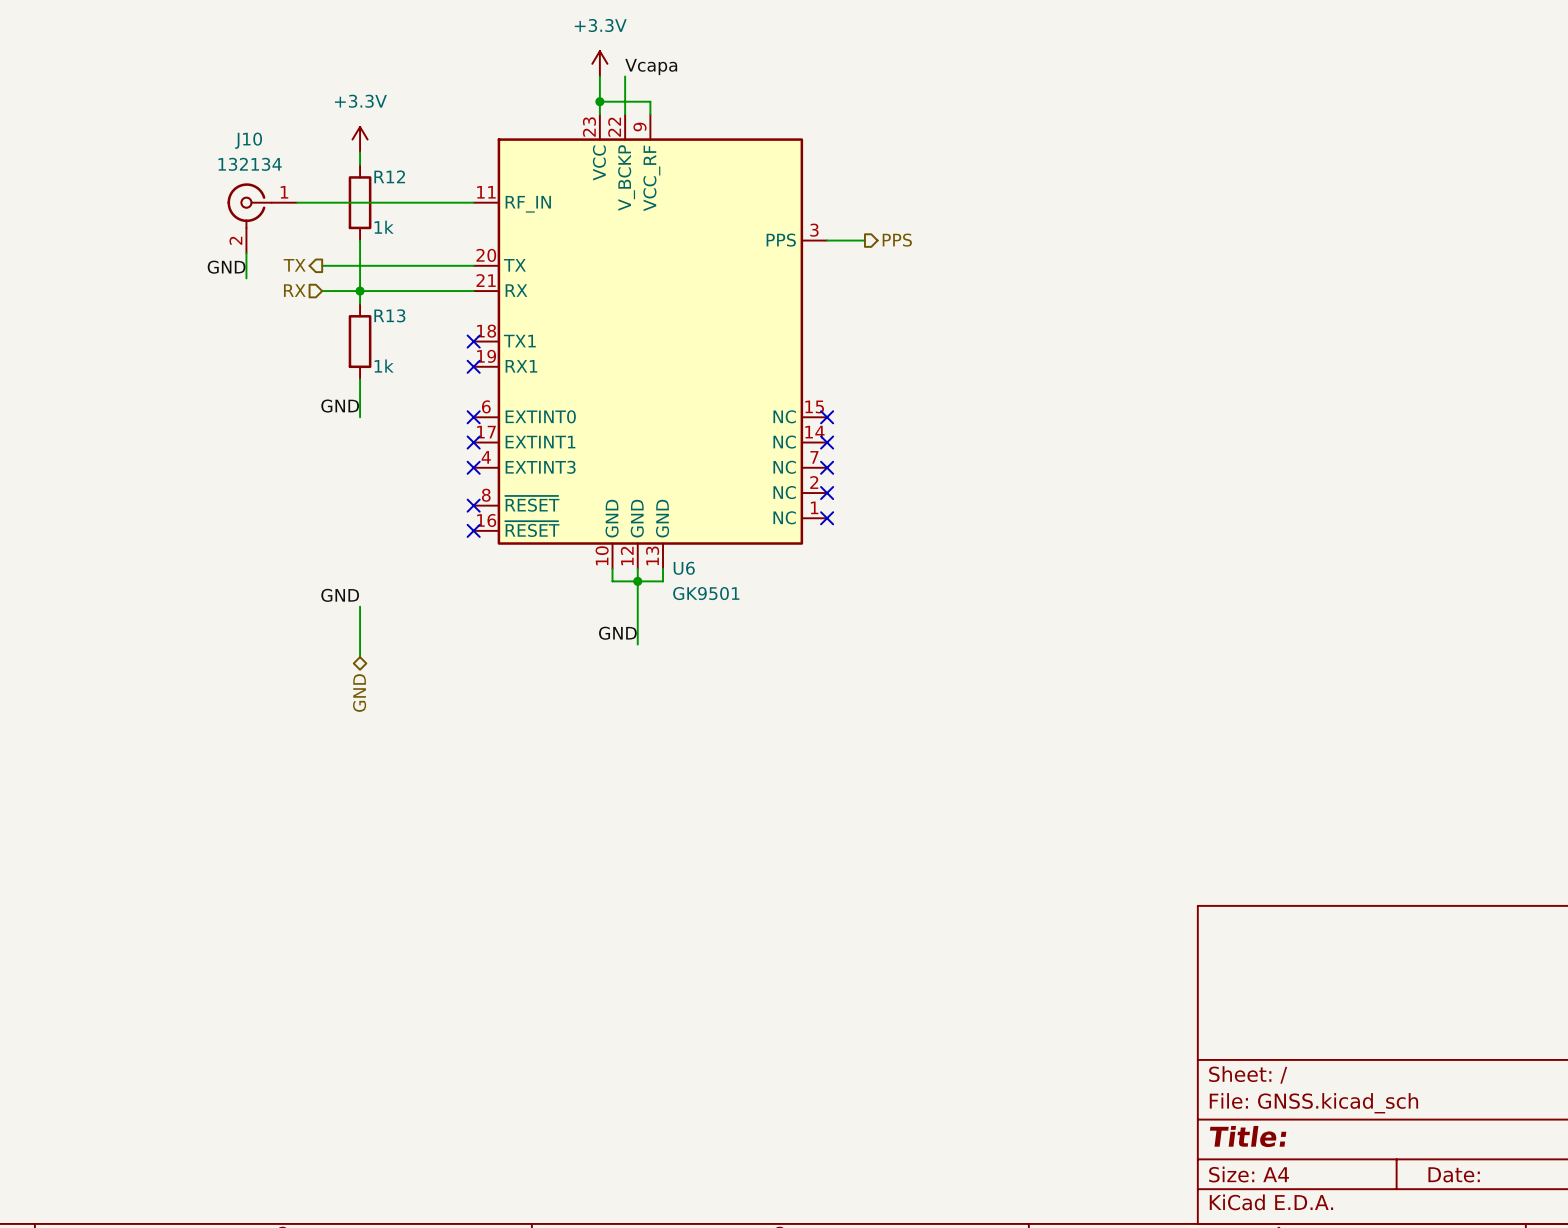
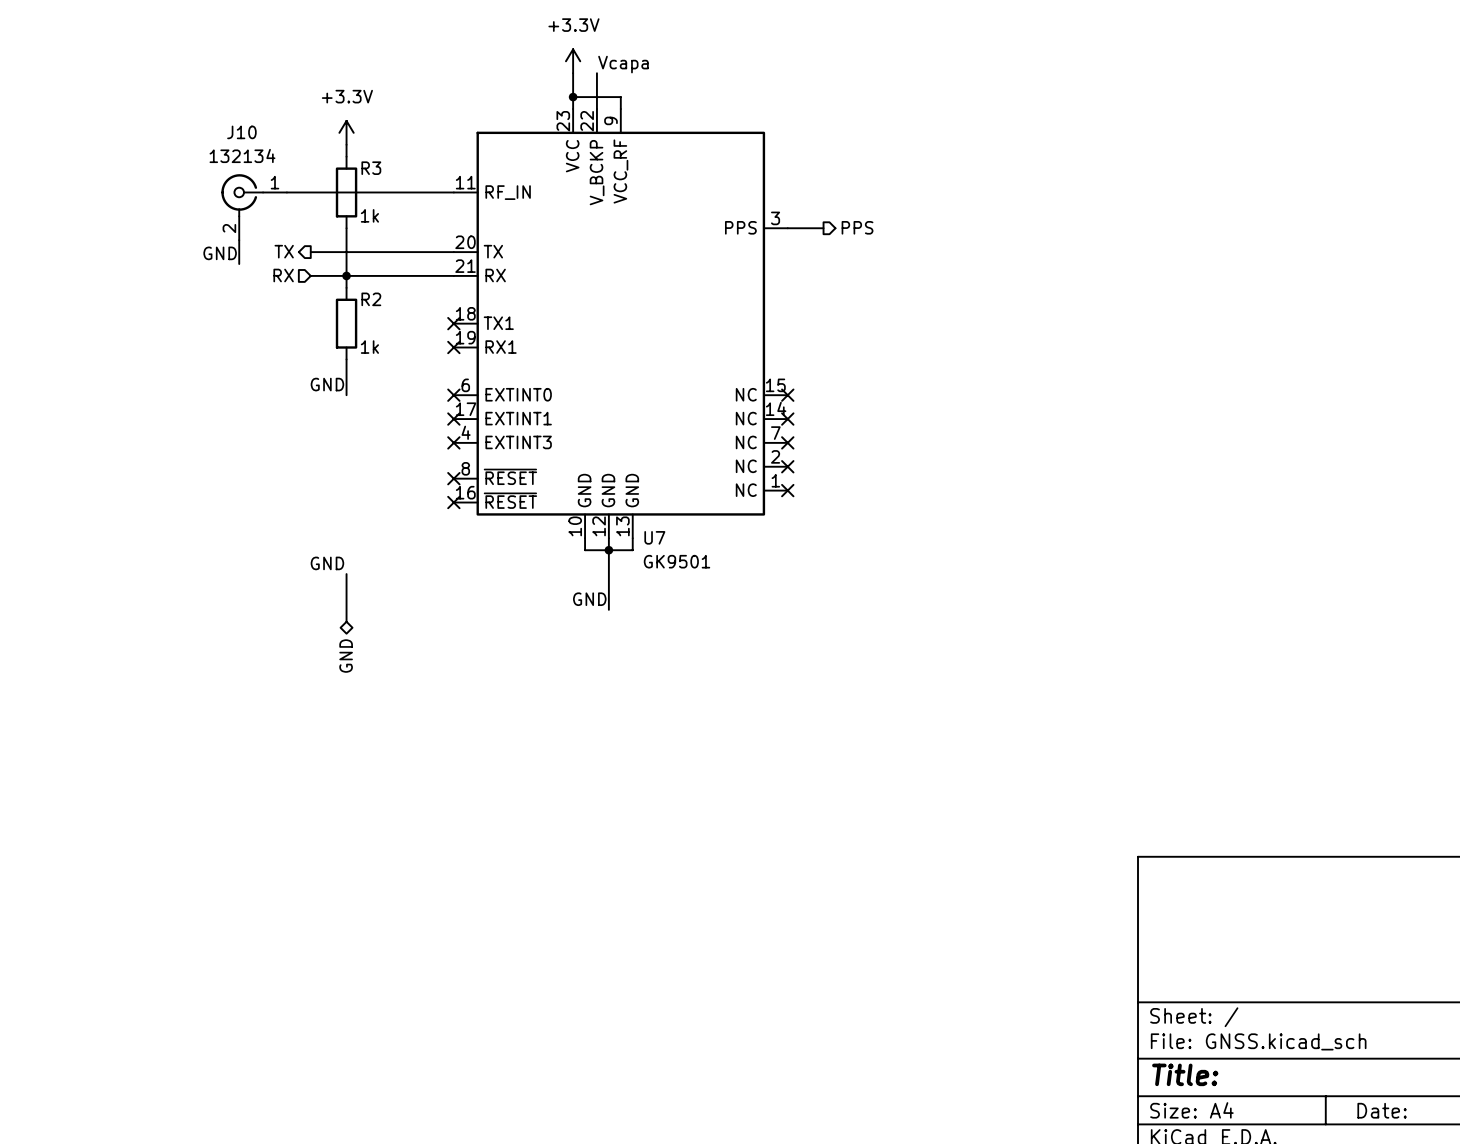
R12 name: R12 (389, 176) -> R3 (371, 168)
R13 name: R13 (389, 315) -> R2 (371, 299)
U6 name: U6 (684, 568) -> U7 (654, 537)

